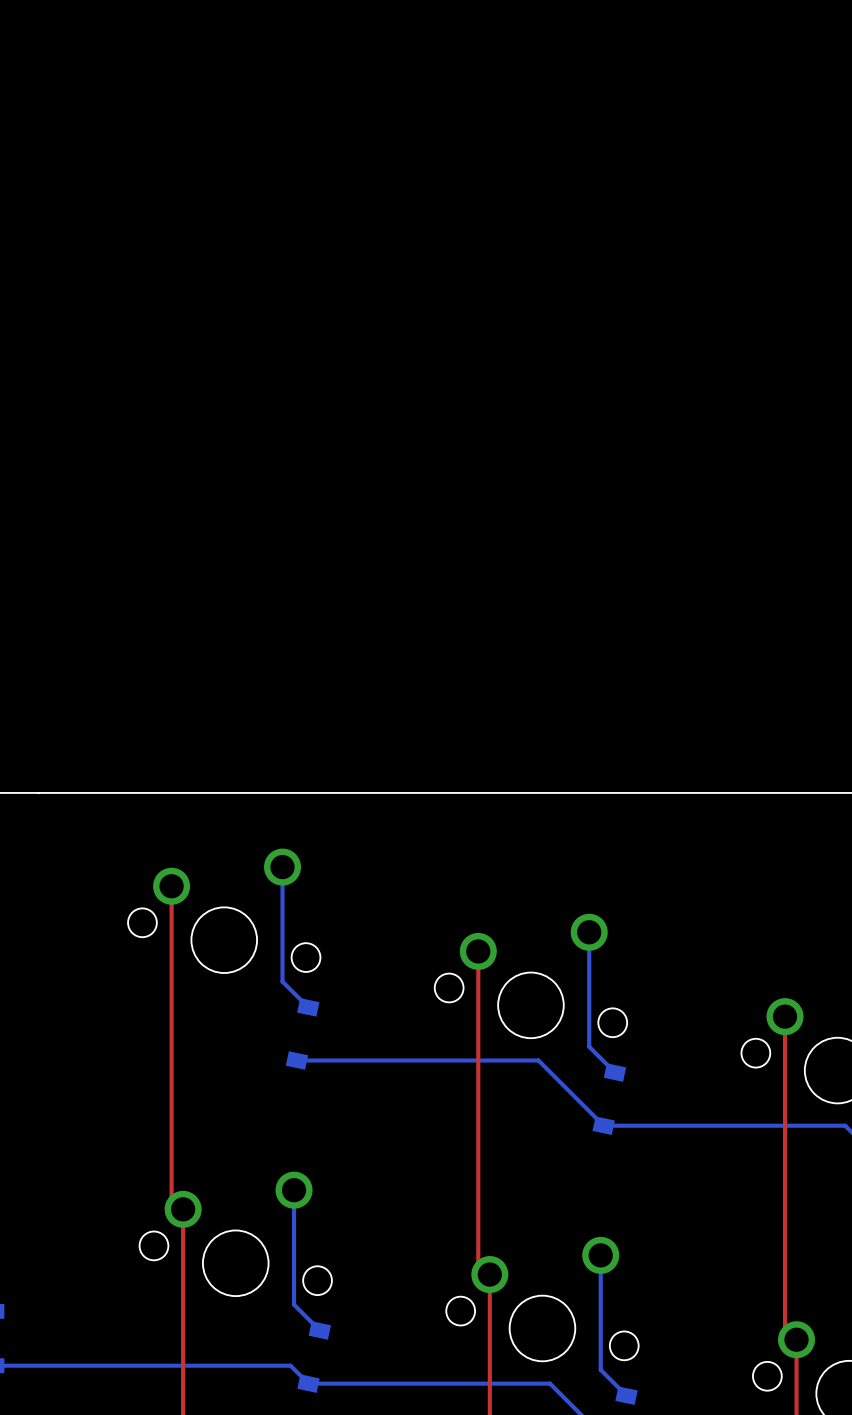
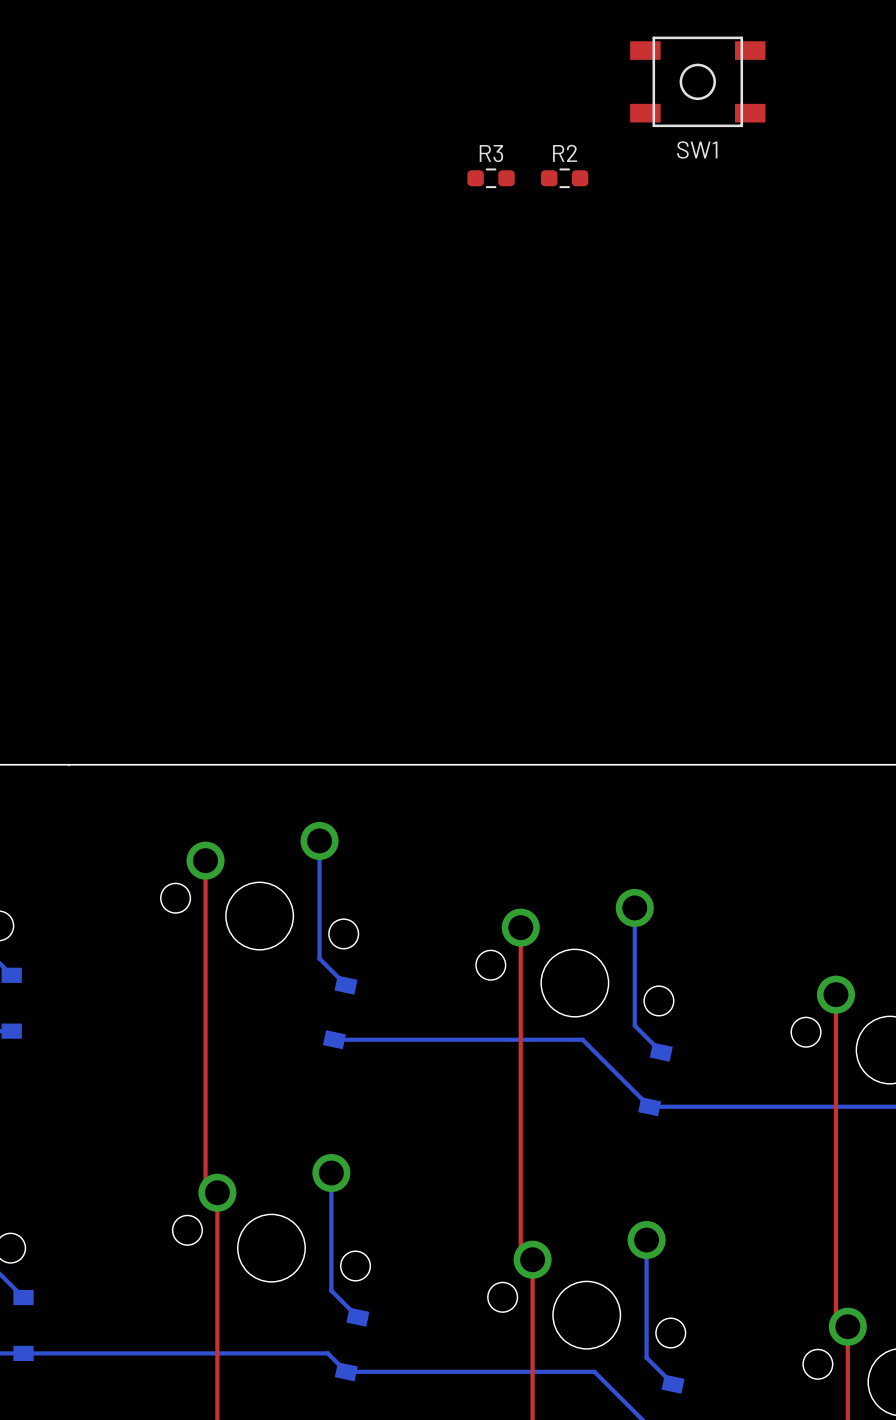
SW1: none -> (697, 81)
R3: none -> (491, 178)
R2: none -> (564, 178)

